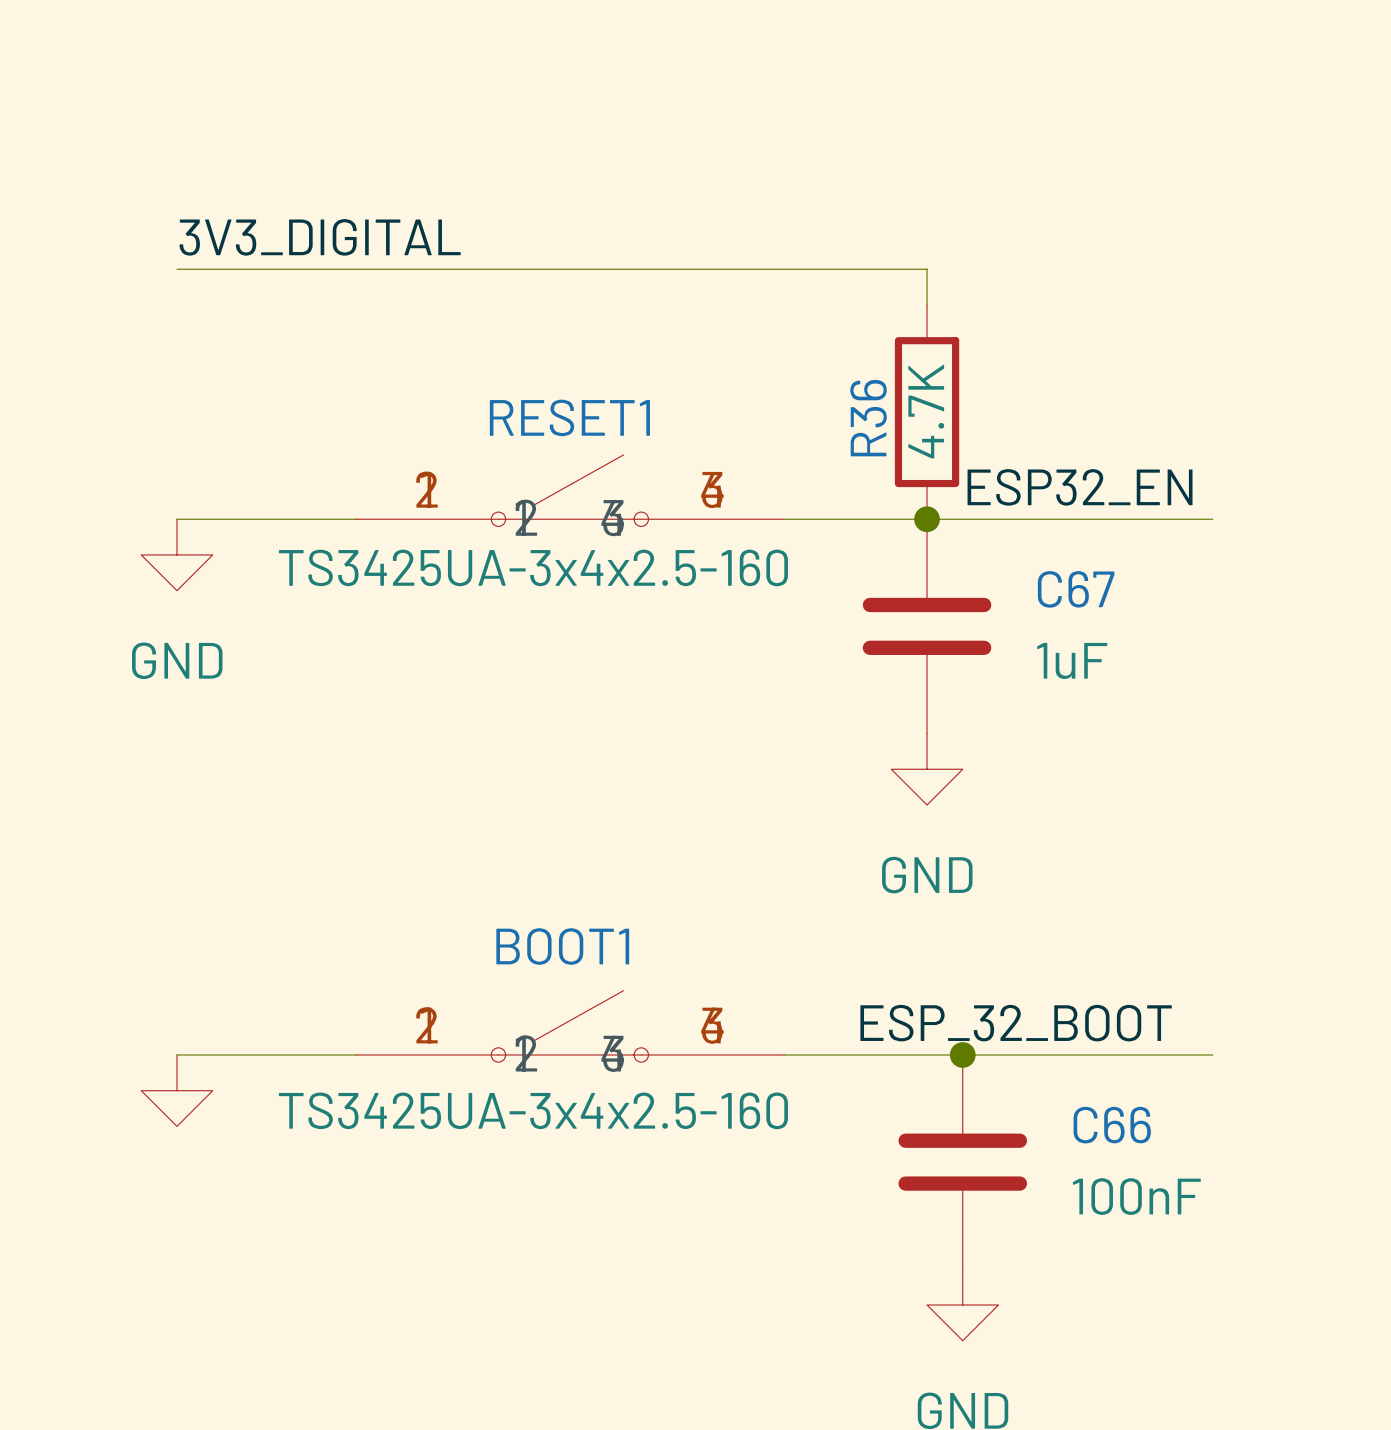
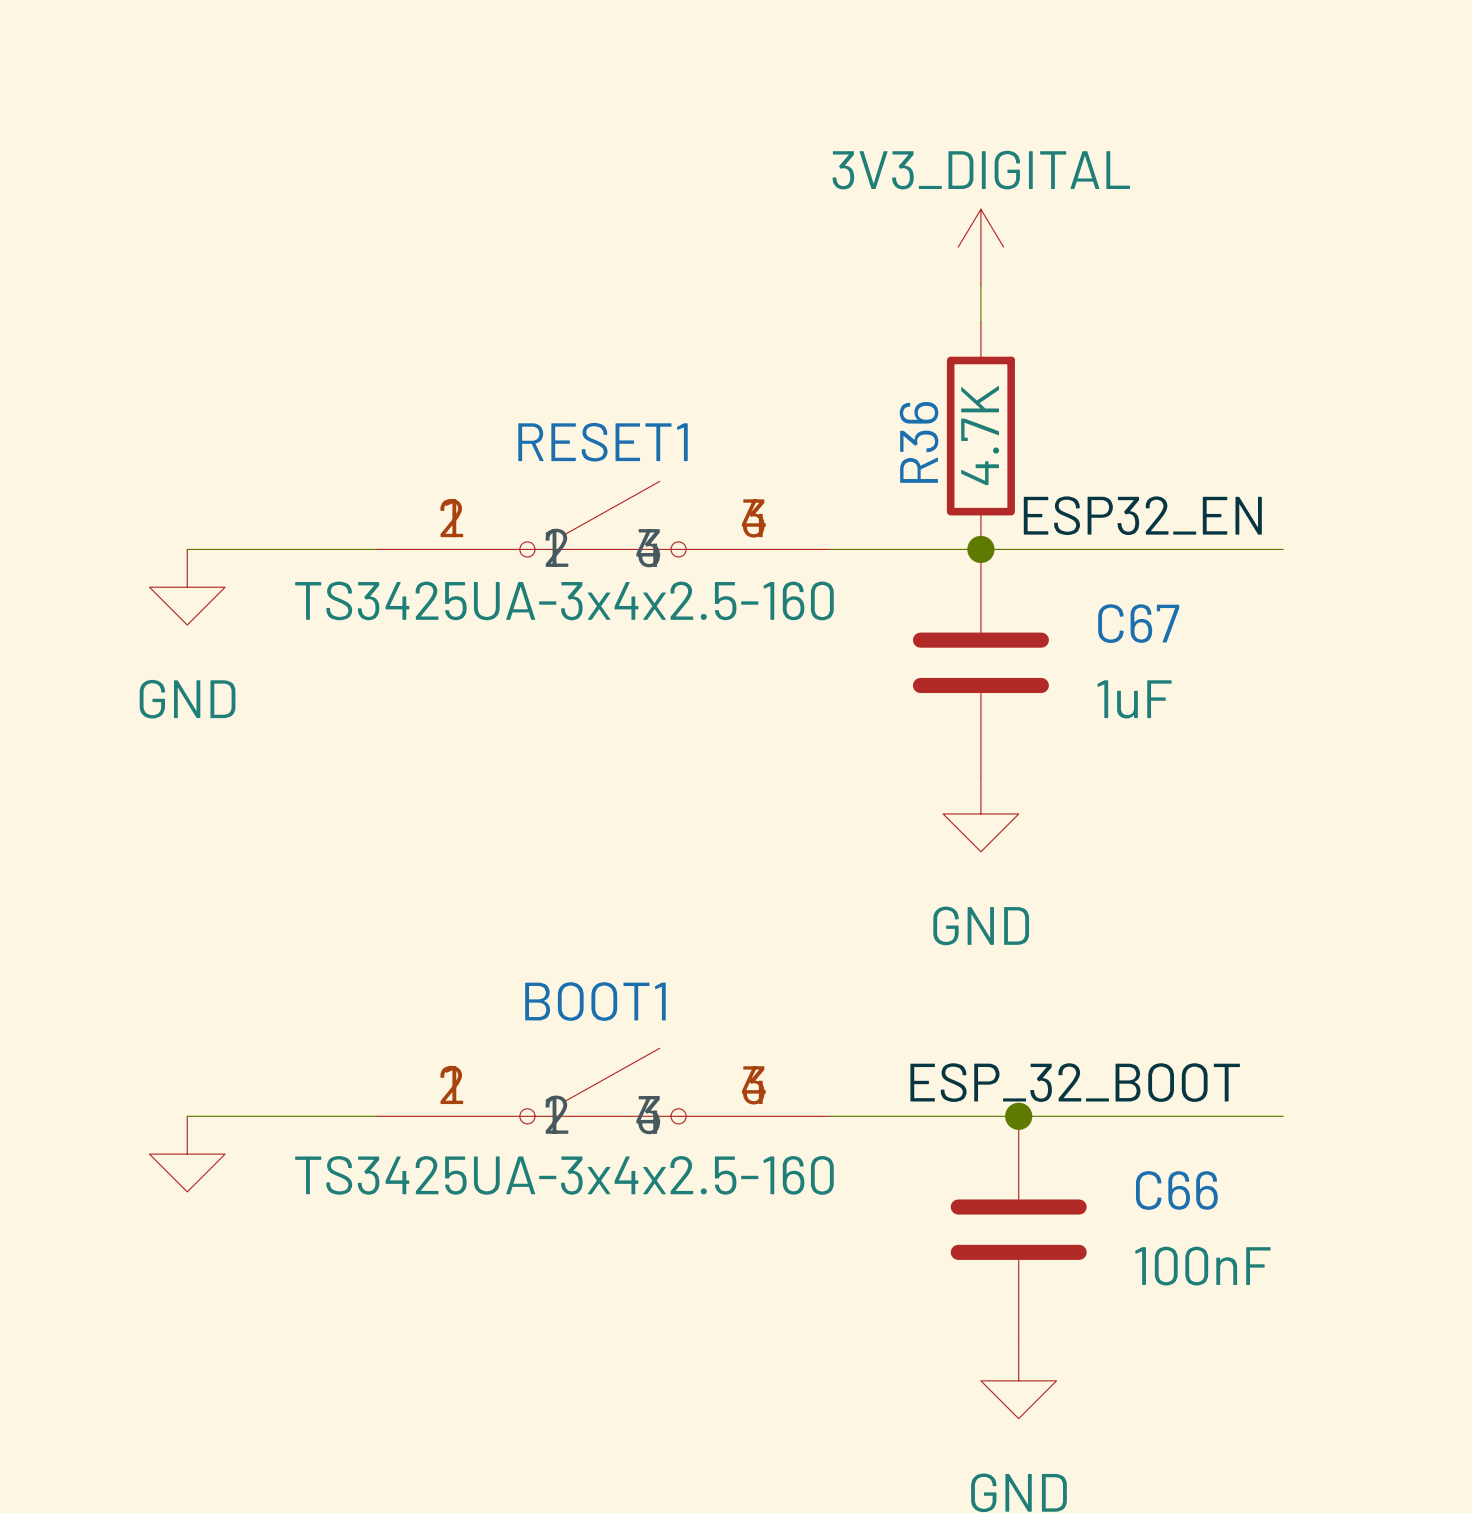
power symbol: none -> 3V3_DIGITAL (980, 247)
label: 3V3_DIGITAL (320, 237) -> none
wire: (176, 269) (927, 269) -> none

